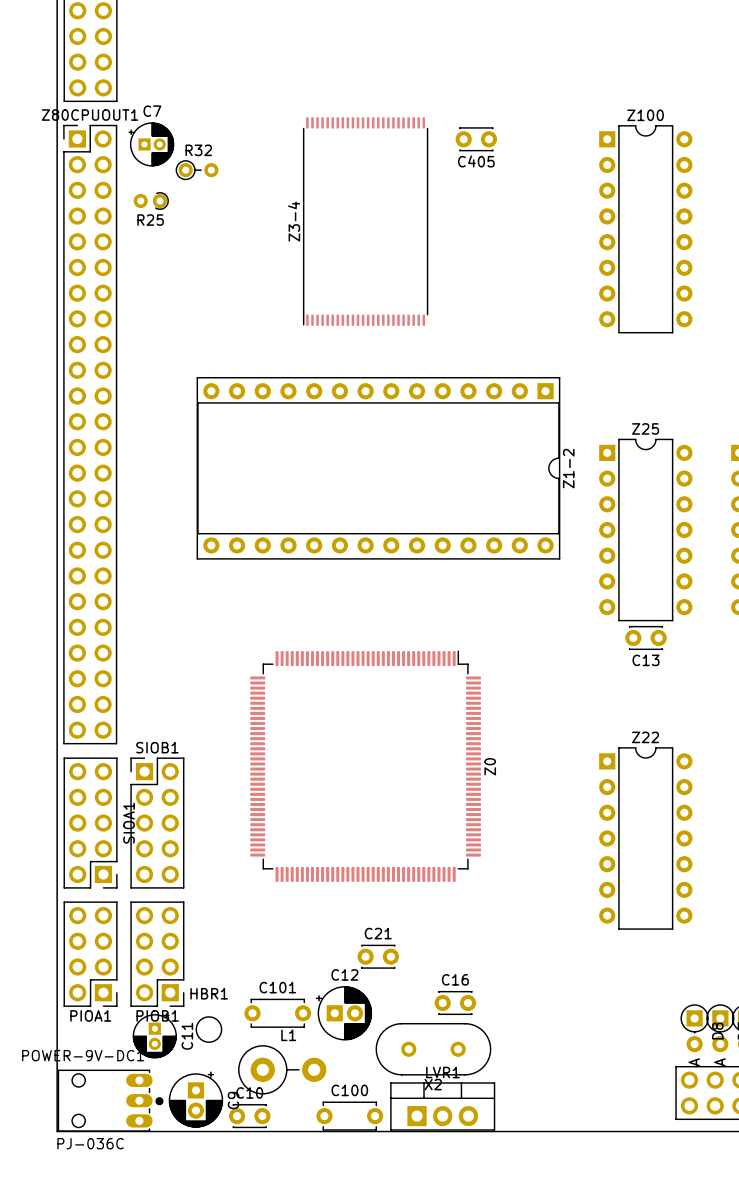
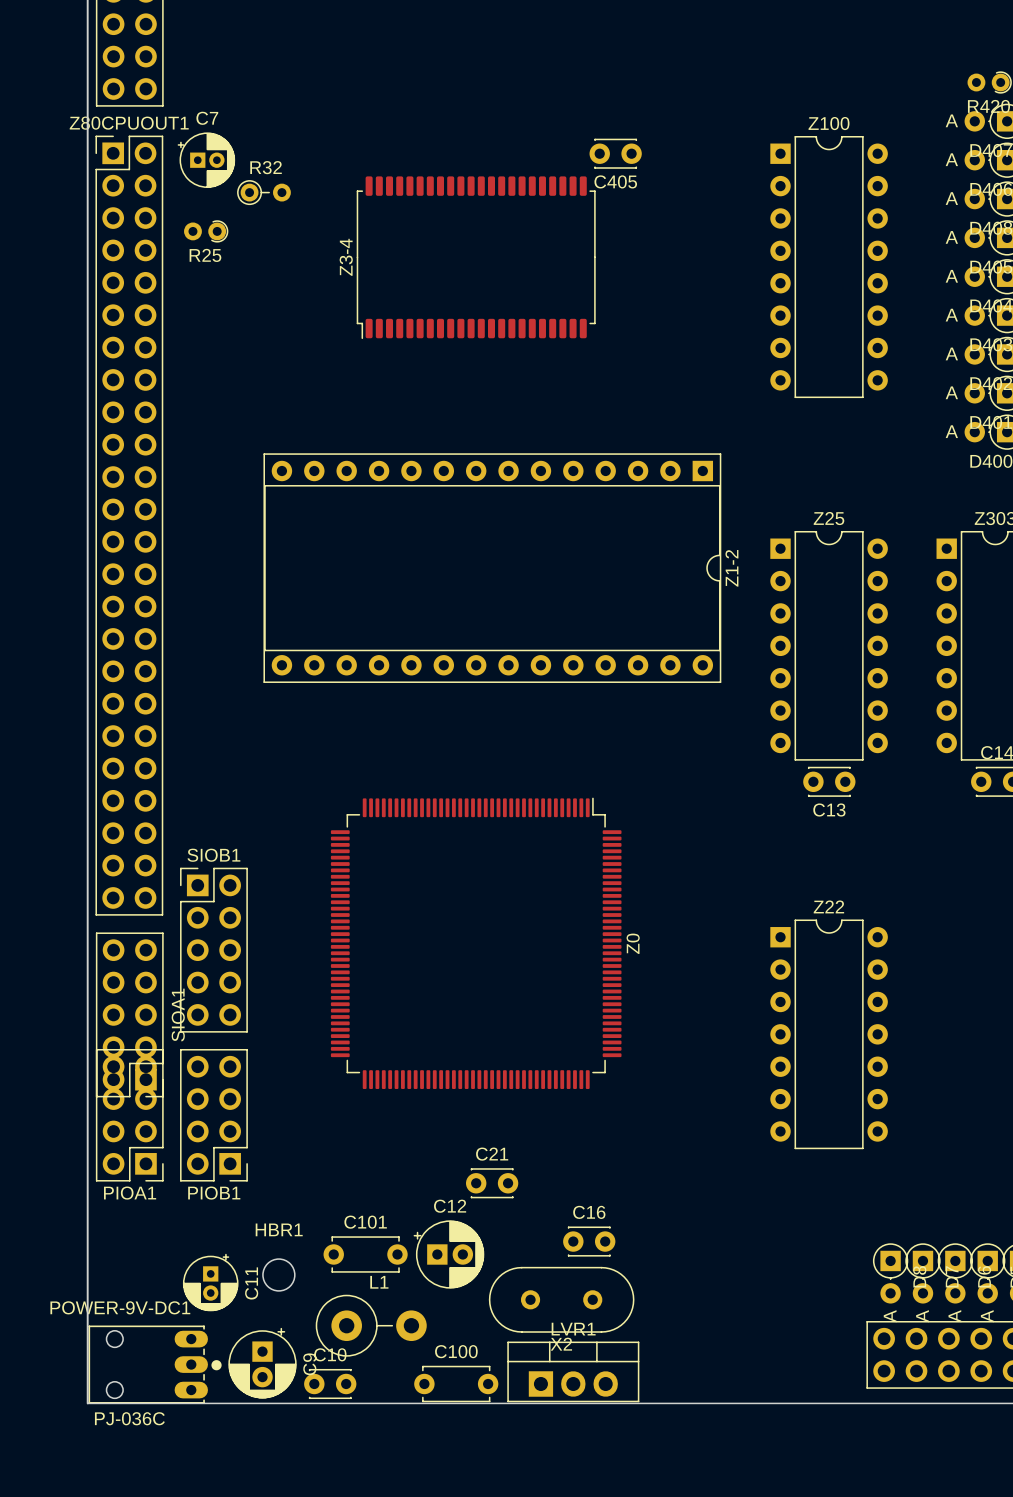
Z3-4 footprint: [303, 117, 429, 326] -> [356, 176, 596, 340]
Z3-4 name position: Z3-4 (294, 221) -> Z3-4 (346, 257)
SIOB1 position: (157, 823) -> (213, 950)
PIOA1 position: (90, 954) -> (129, 1115)
PIOB1 position: (157, 954) -> (213, 1115)

